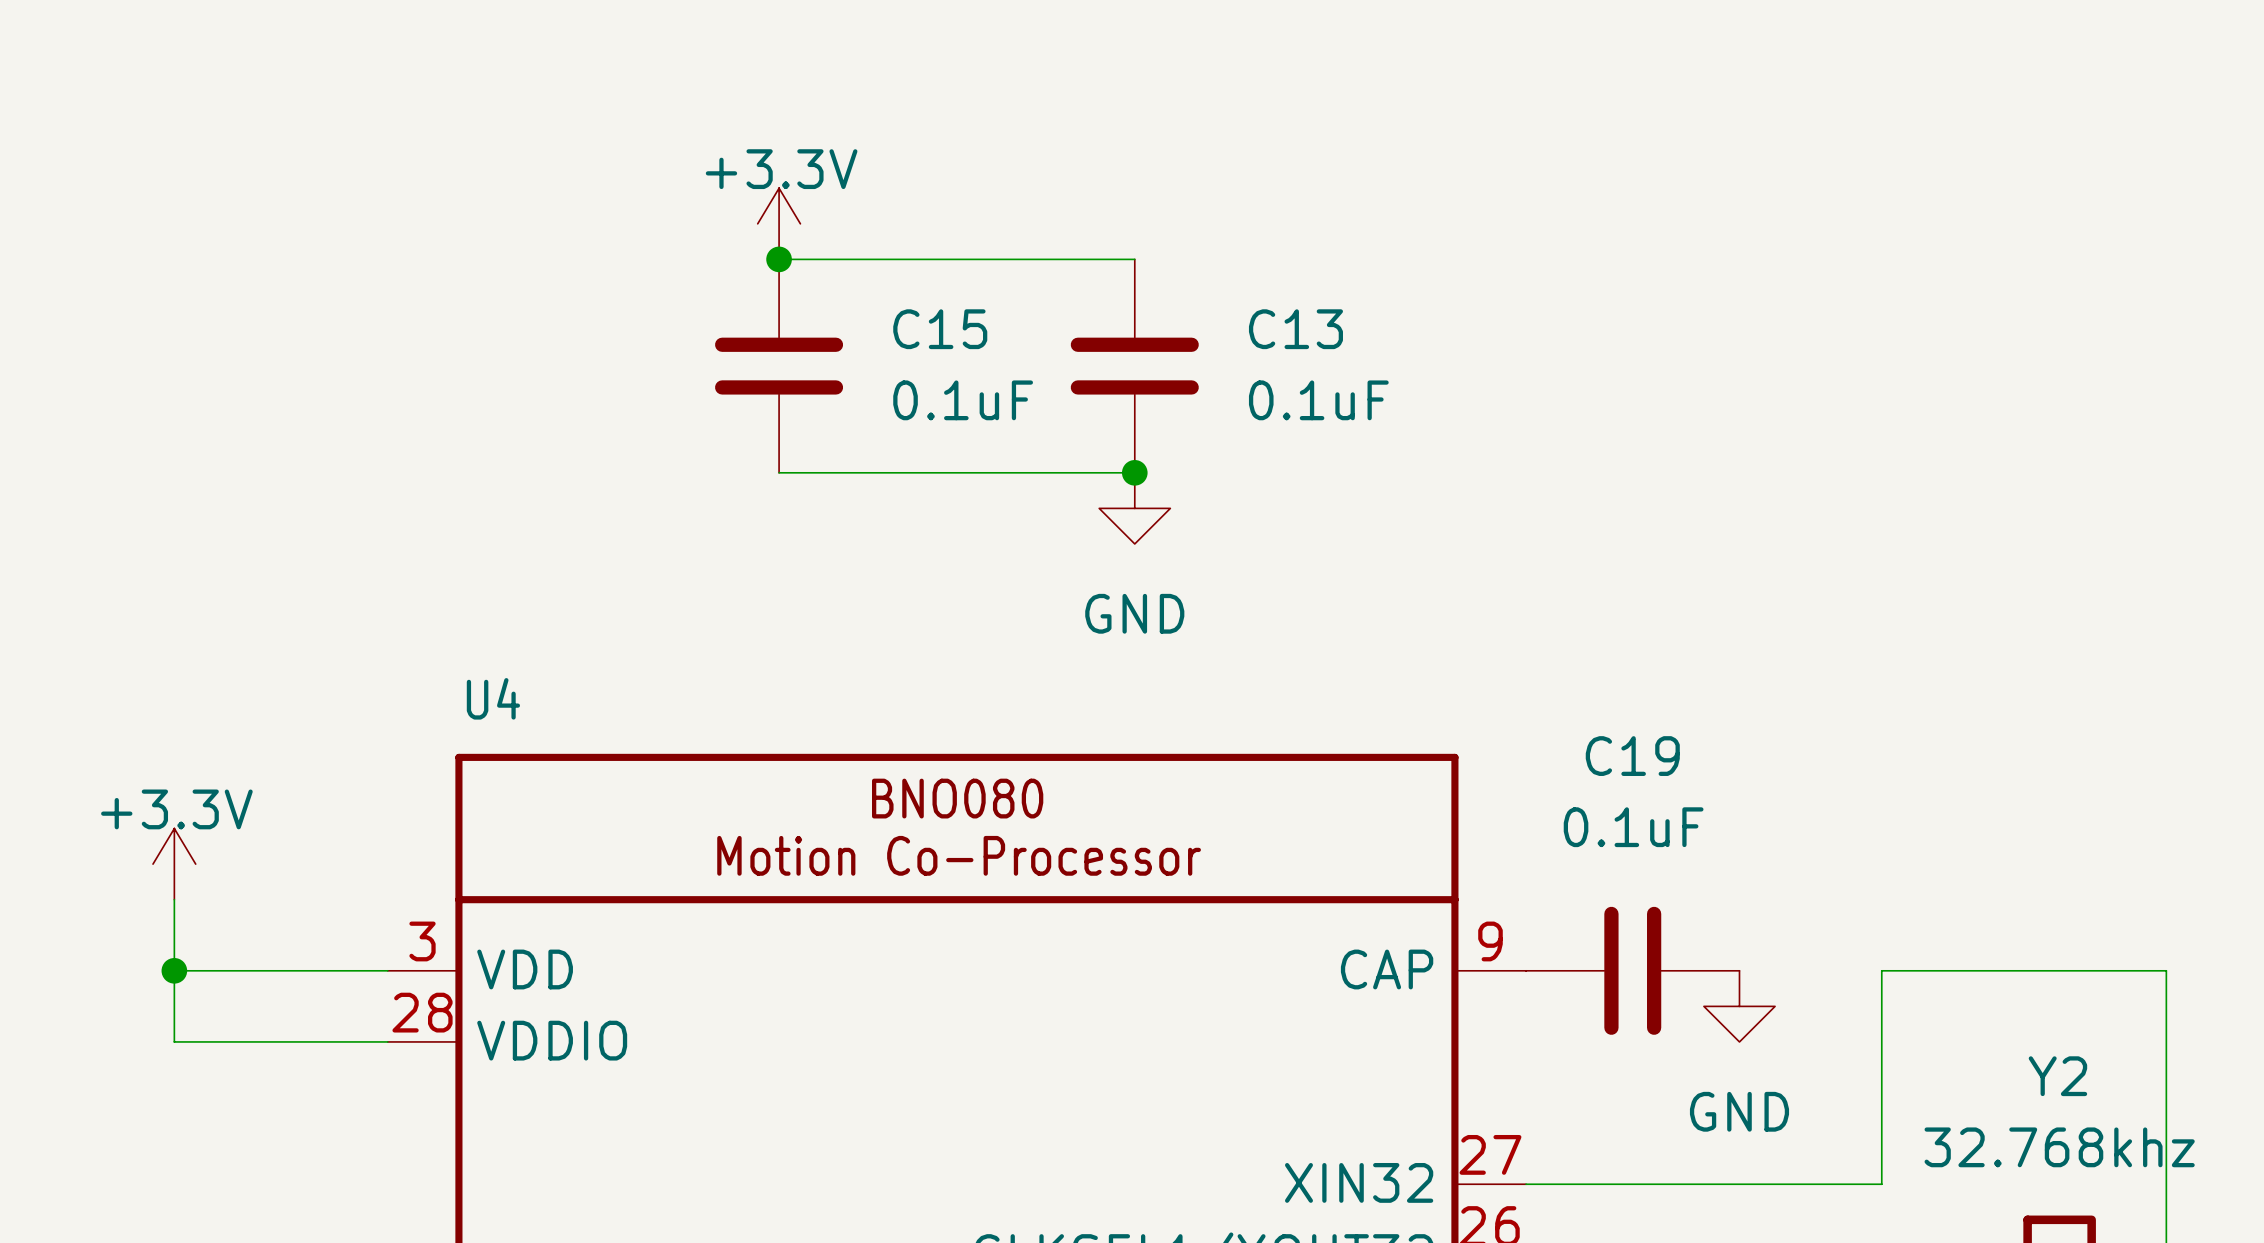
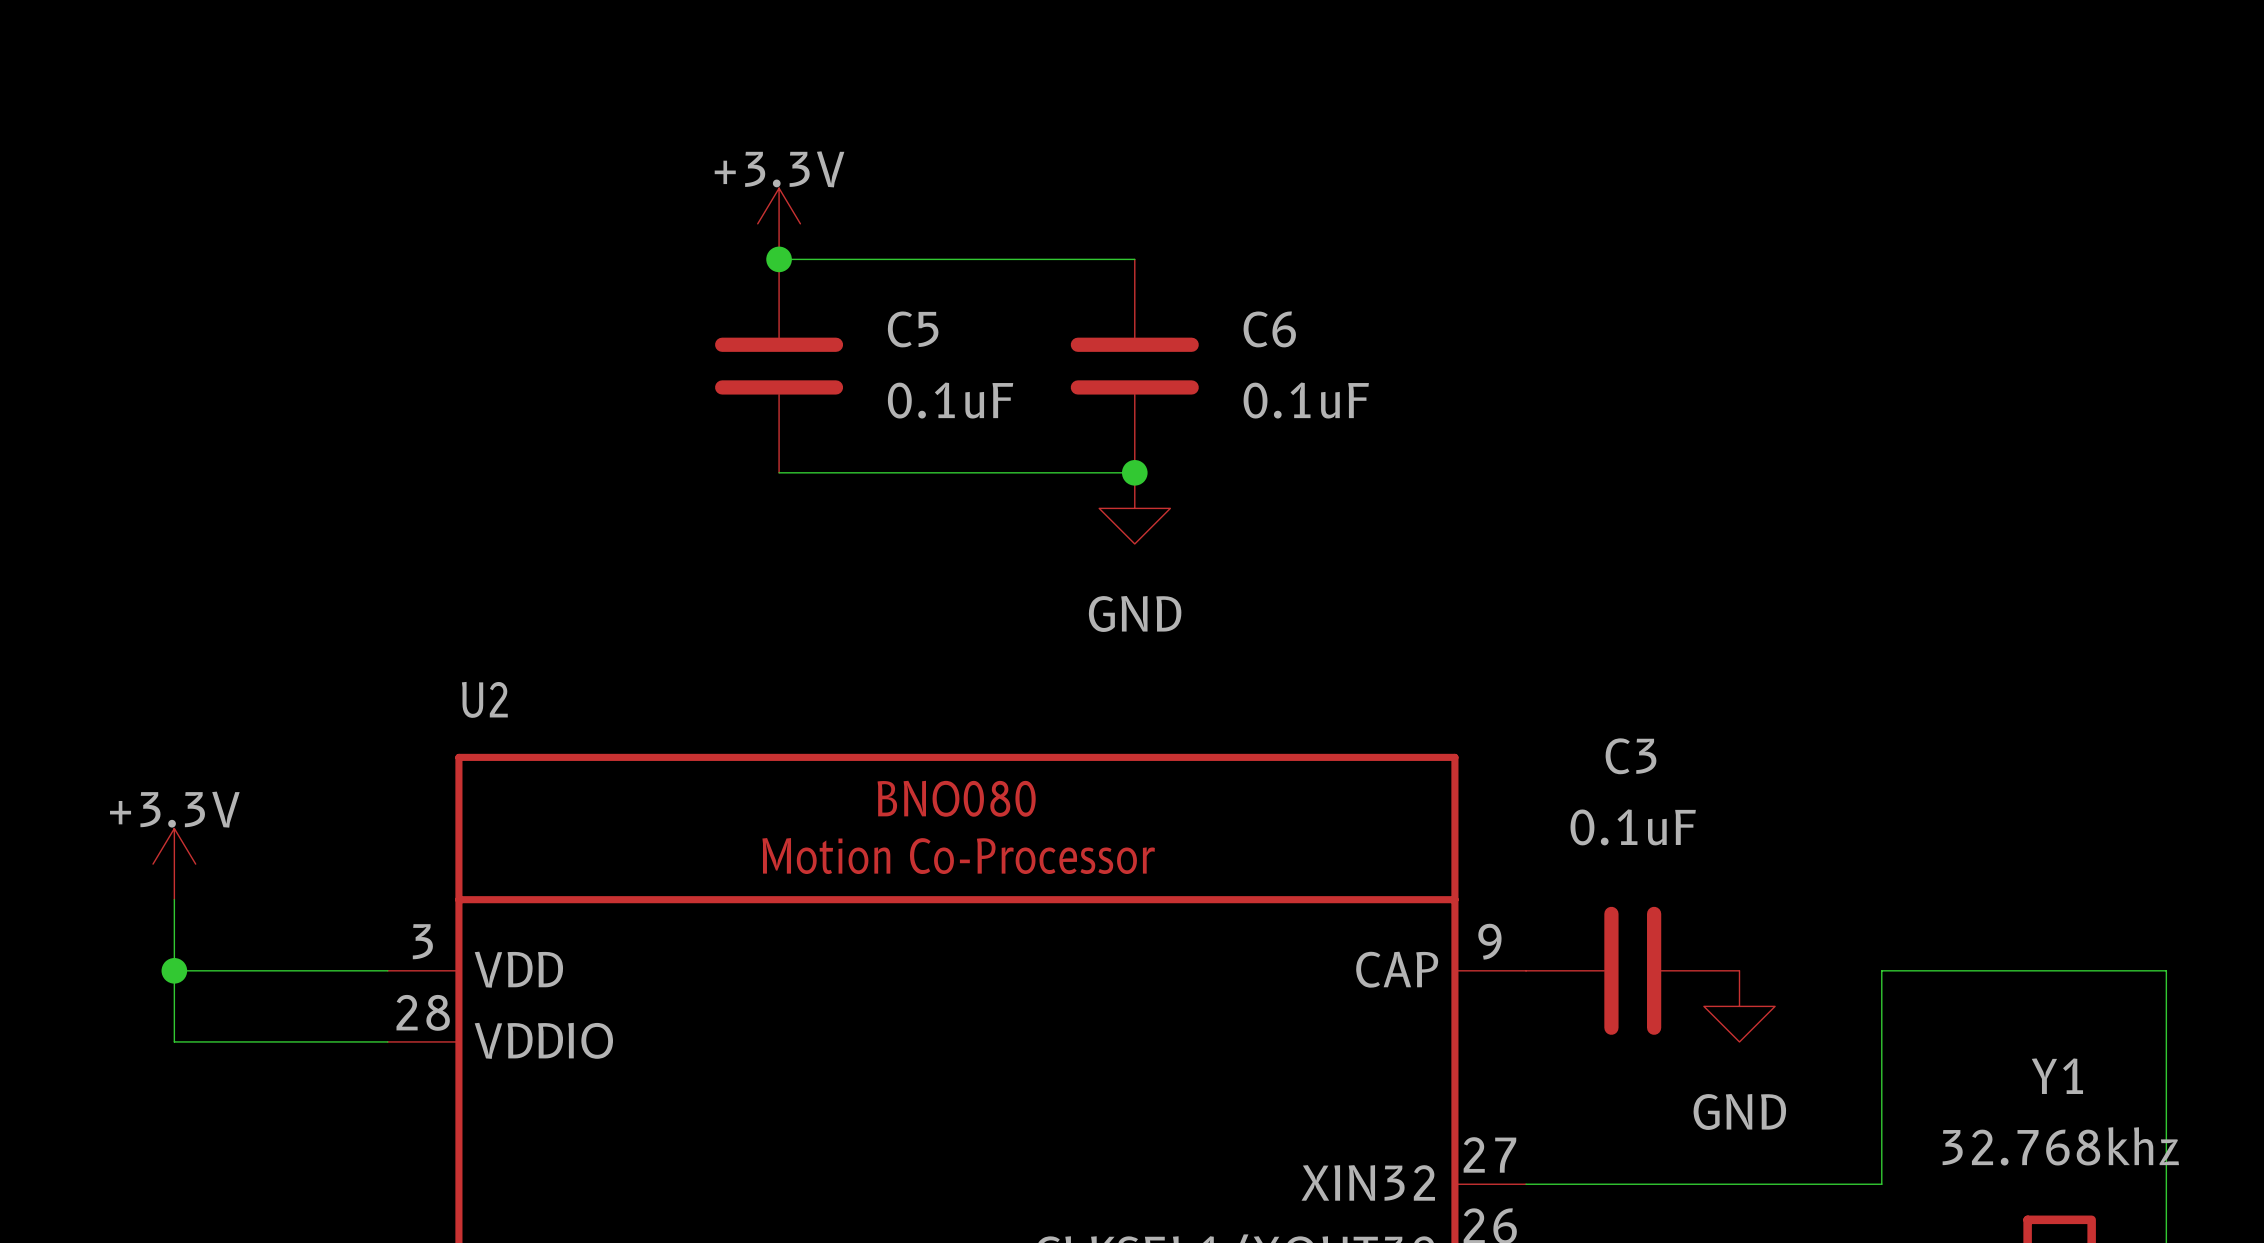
C15 name: C15 (940, 329) -> C5 (913, 329)
C13 name: C13 (1295, 329) -> C6 (1269, 329)
U4 name: U4 (493, 698) -> U2 (484, 699)
C19 name: C19 (1632, 756) -> C3 (1630, 756)
Y2 name: Y2 (2057, 1076) -> Y1 (2057, 1076)

